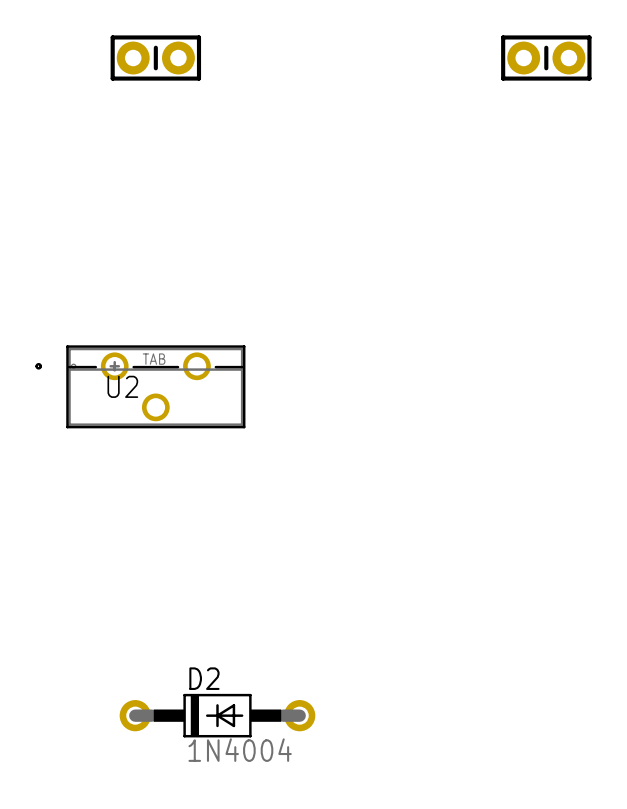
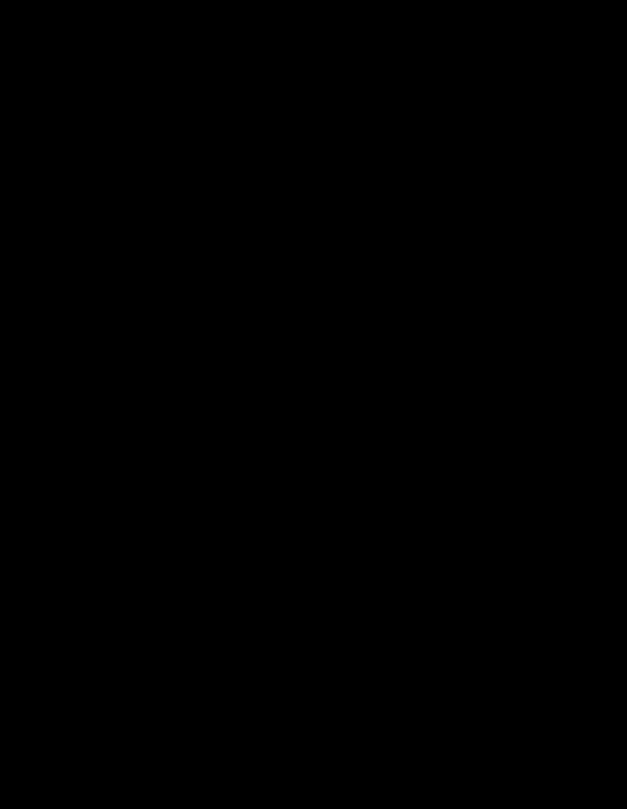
part: (155, 58) -> none
part: (546, 58) -> none
U2: (140, 386) -> none
D2: 1N4004 (217, 715) -> none

